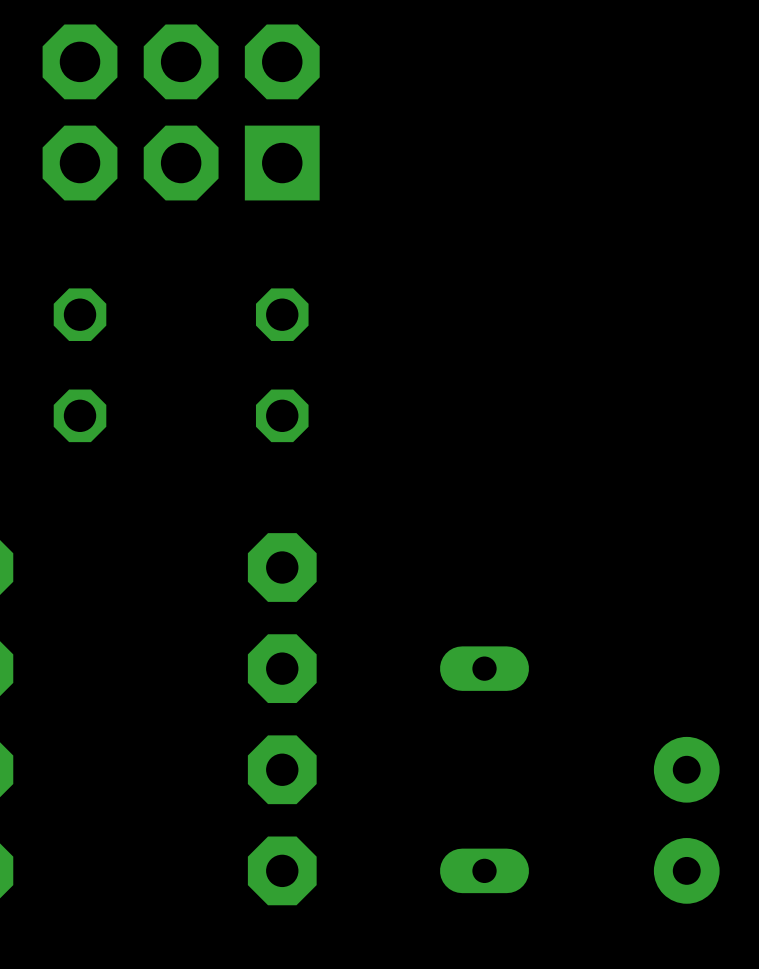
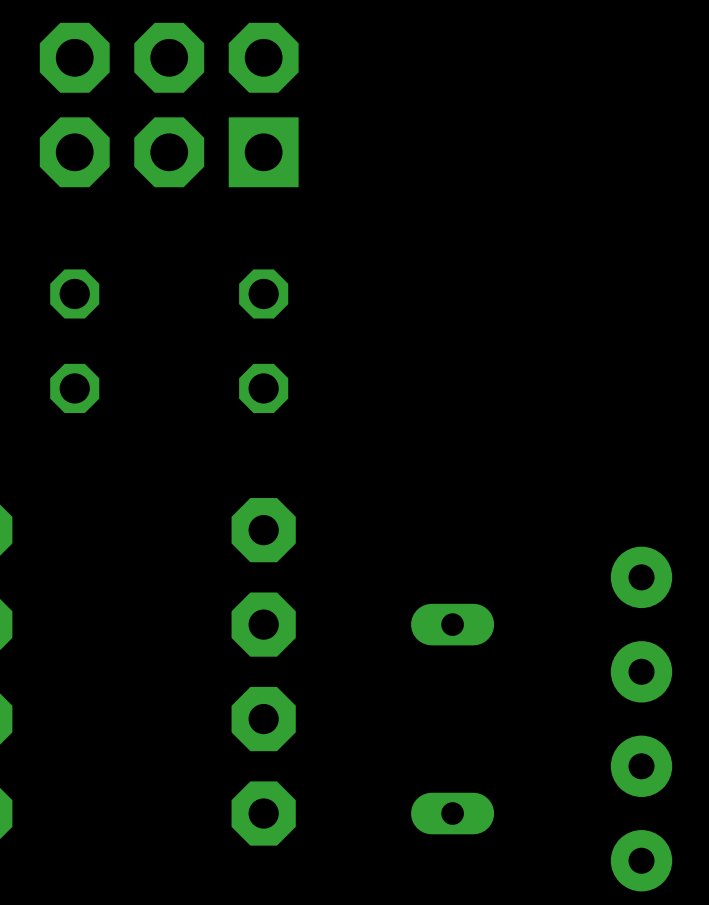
part: none -> (641, 624)
part position: (686, 820) -> (641, 813)

